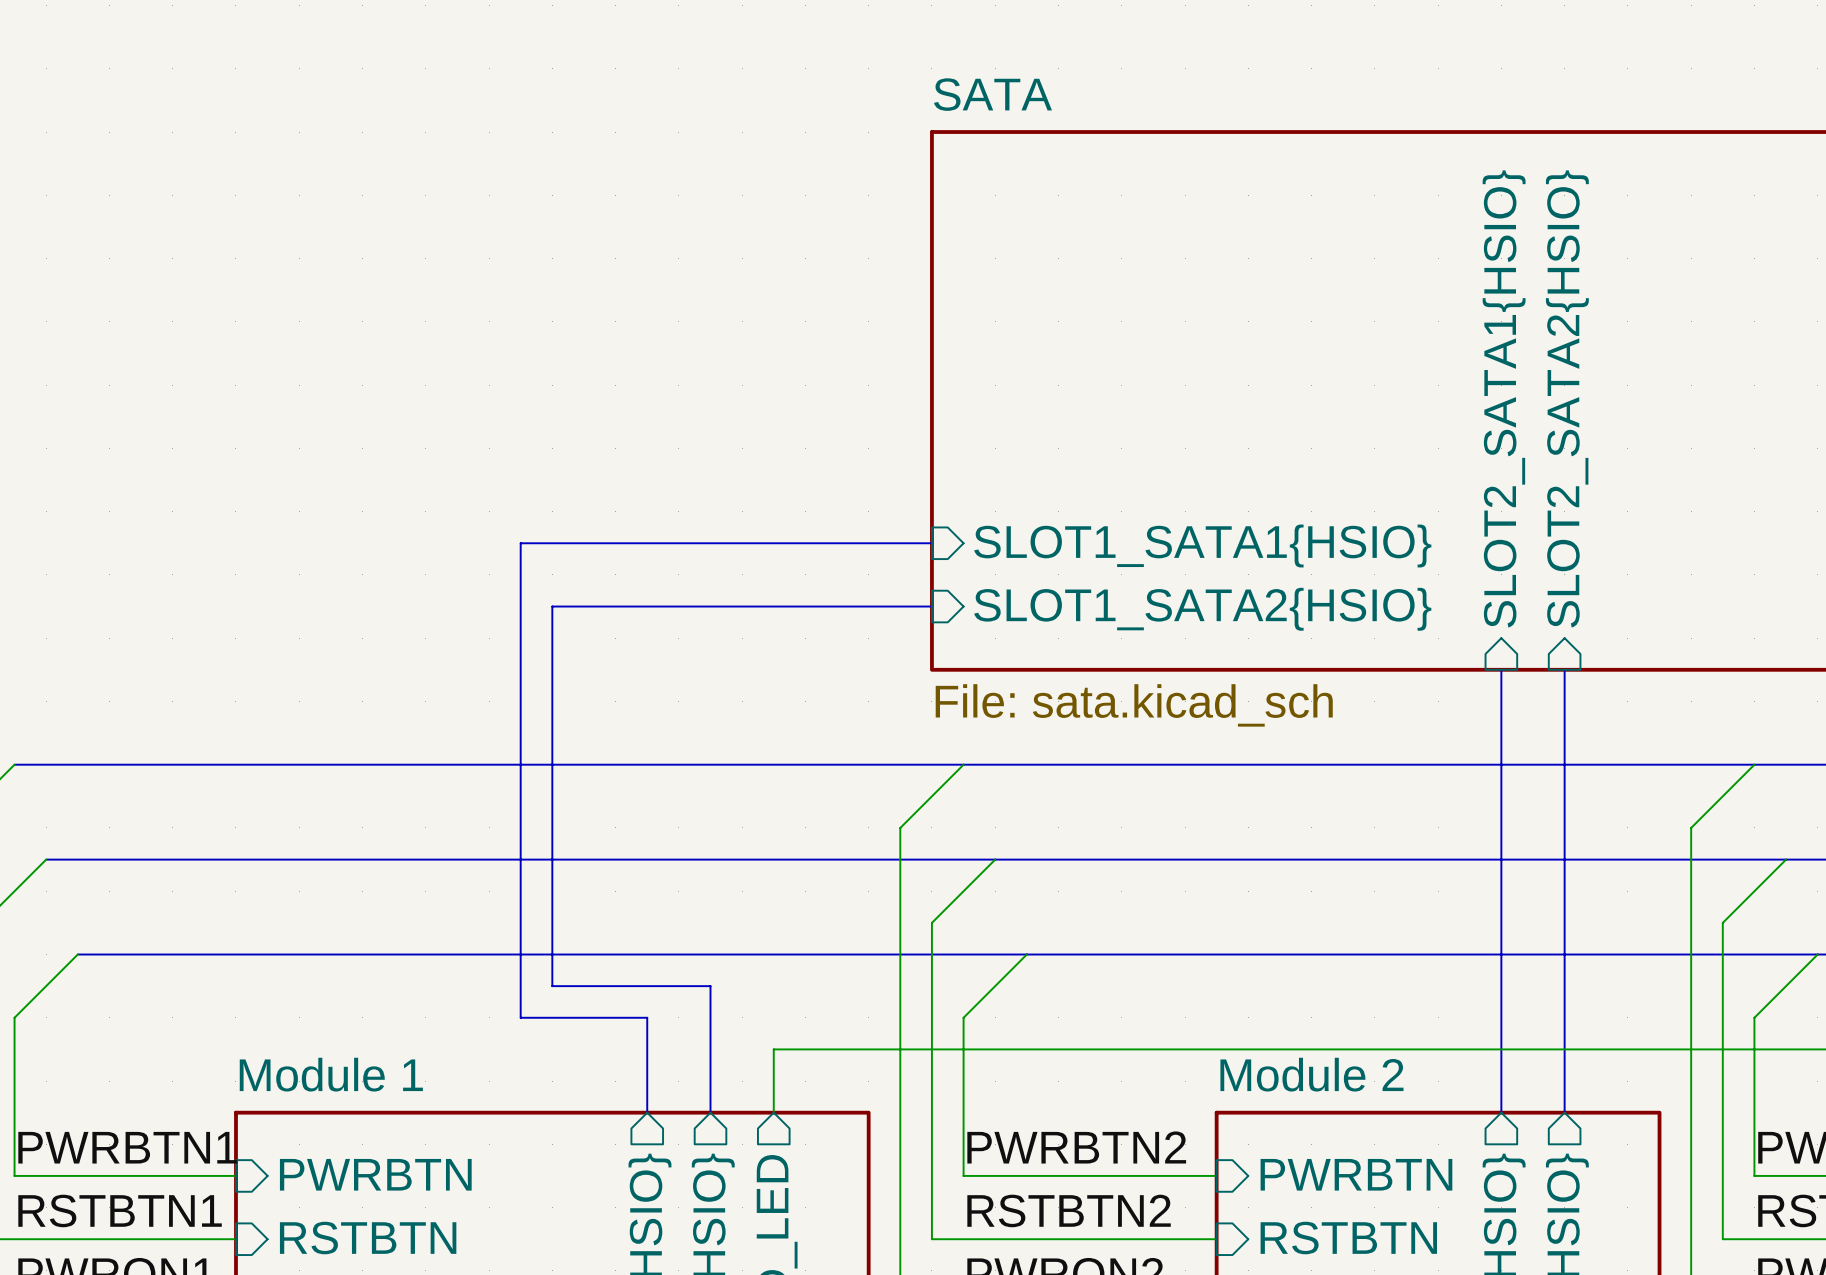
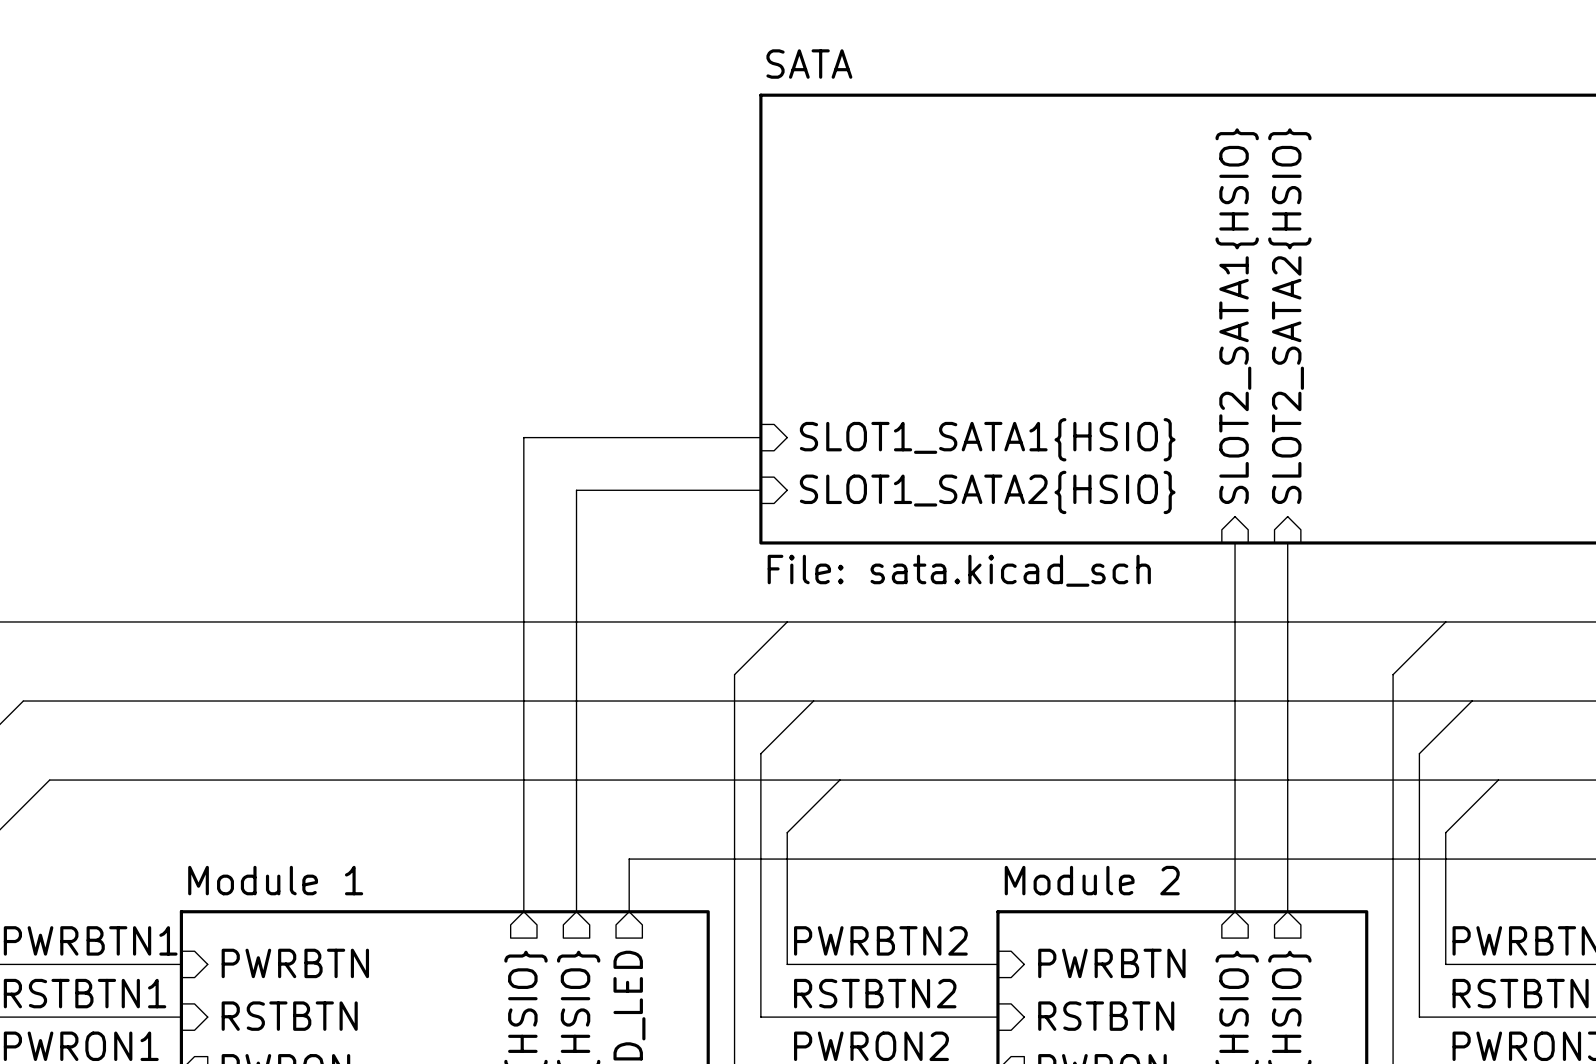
bus: (647, 543) (520, 543) (520, 1017) (647, 1017) -> (523, 437) (523, 832)
bus: (710, 606) (552, 606) (552, 986) (710, 986) -> (576, 490) (576, 806)

